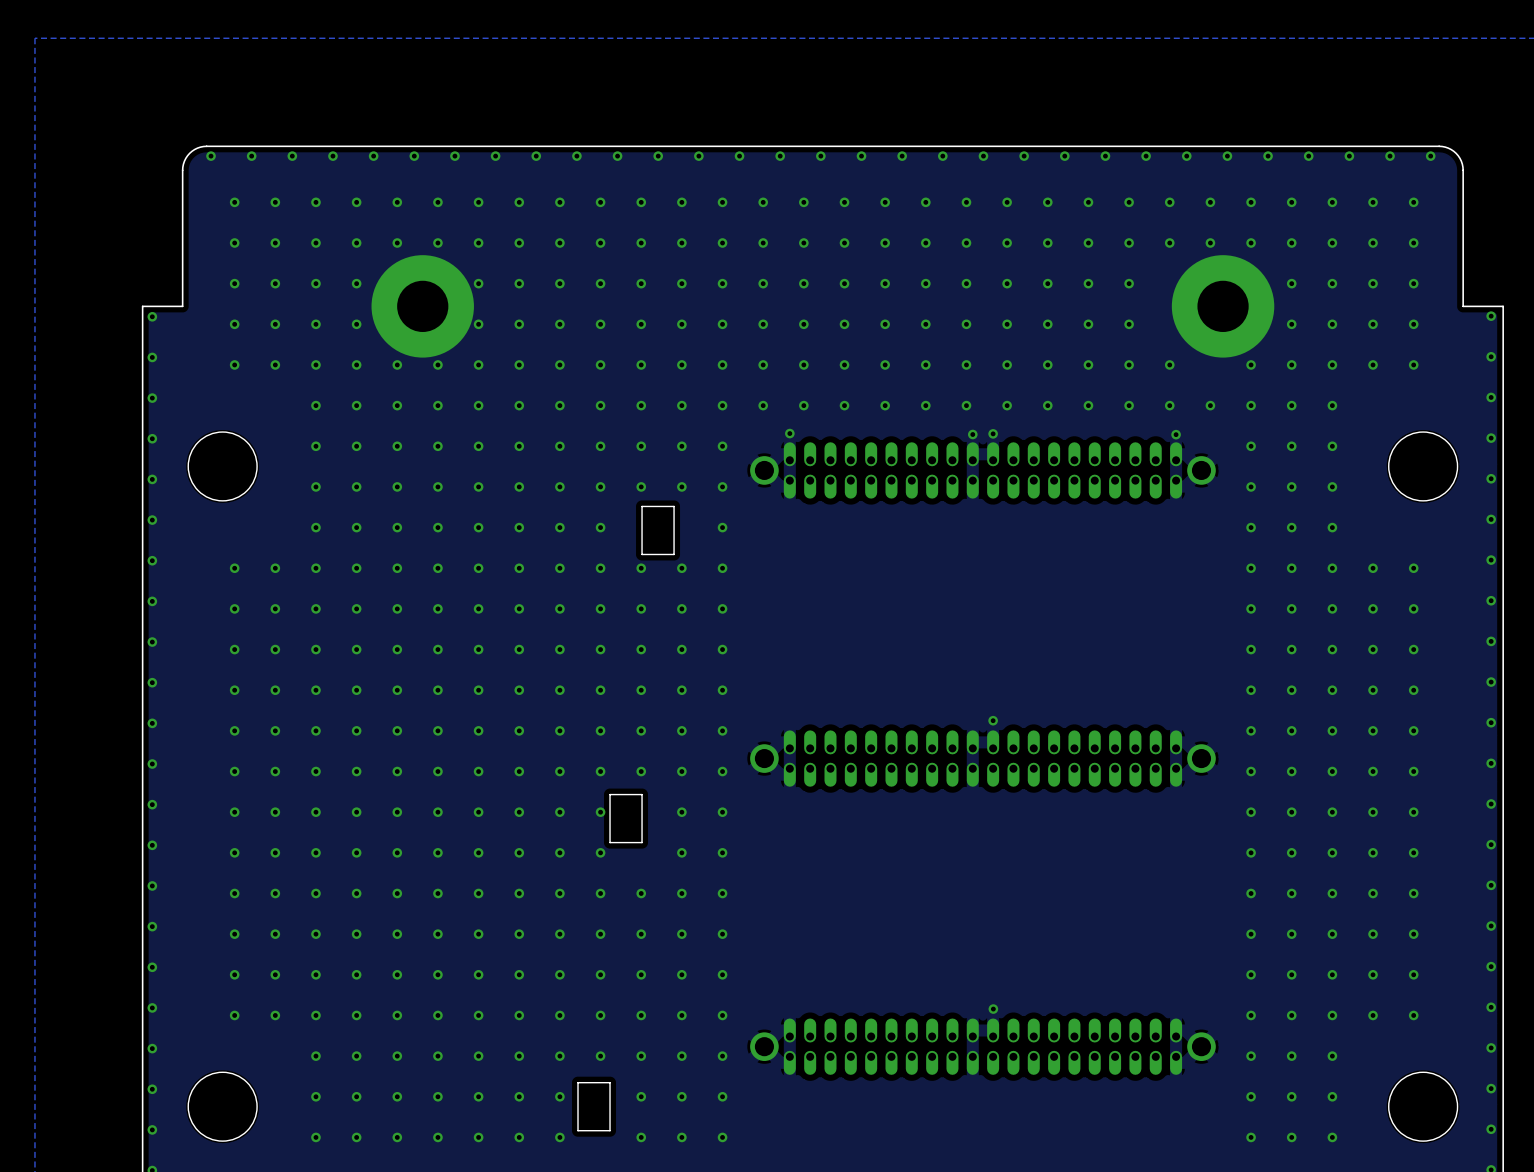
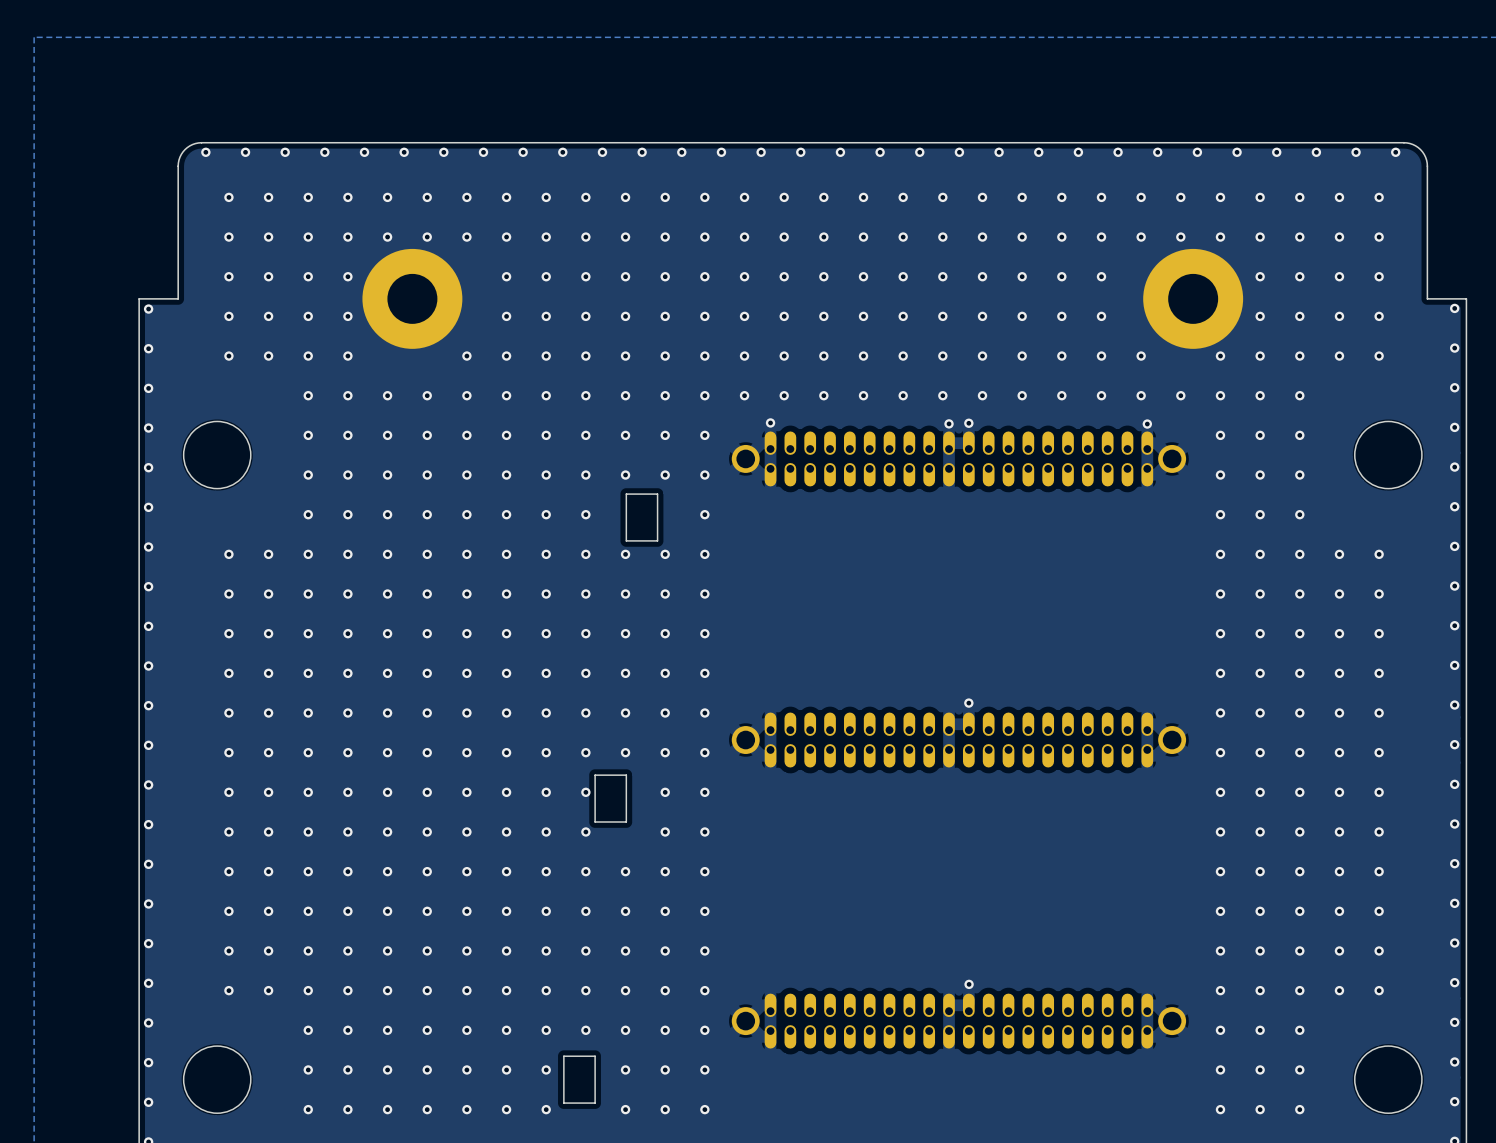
via: (478, 283) -> none
via: (478, 324) -> none
via: (397, 364) -> none
via: (437, 364) -> none

